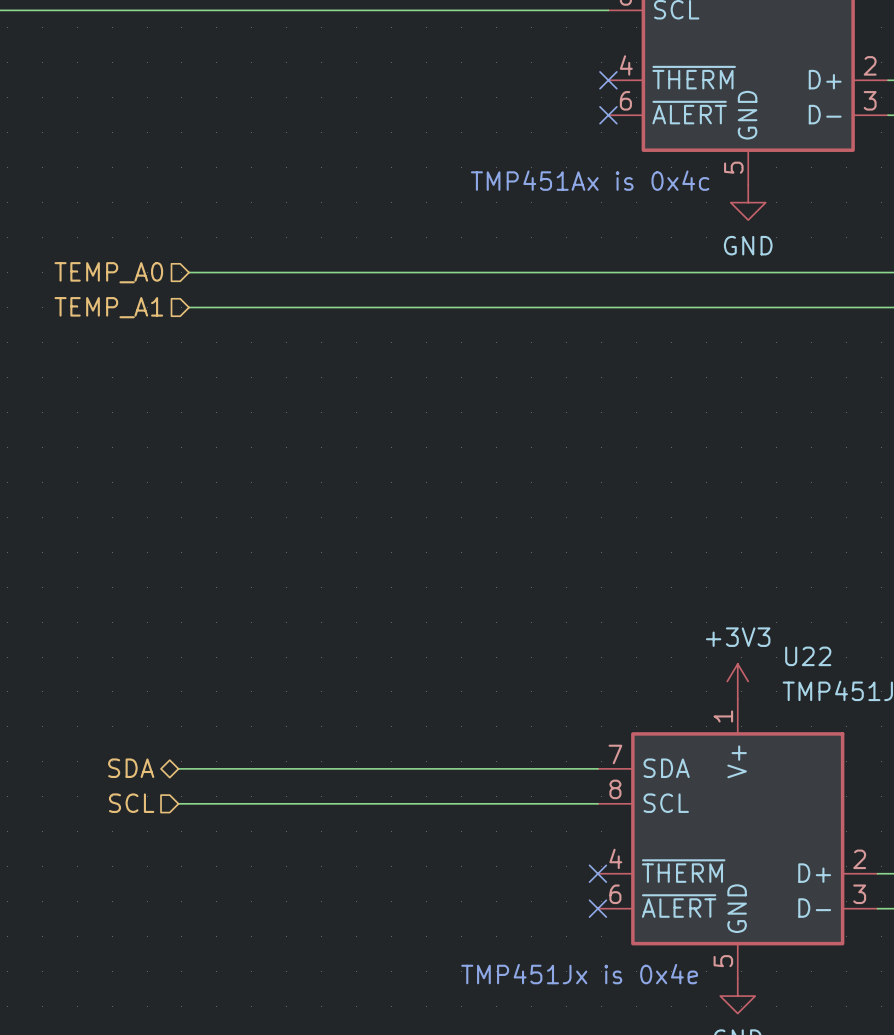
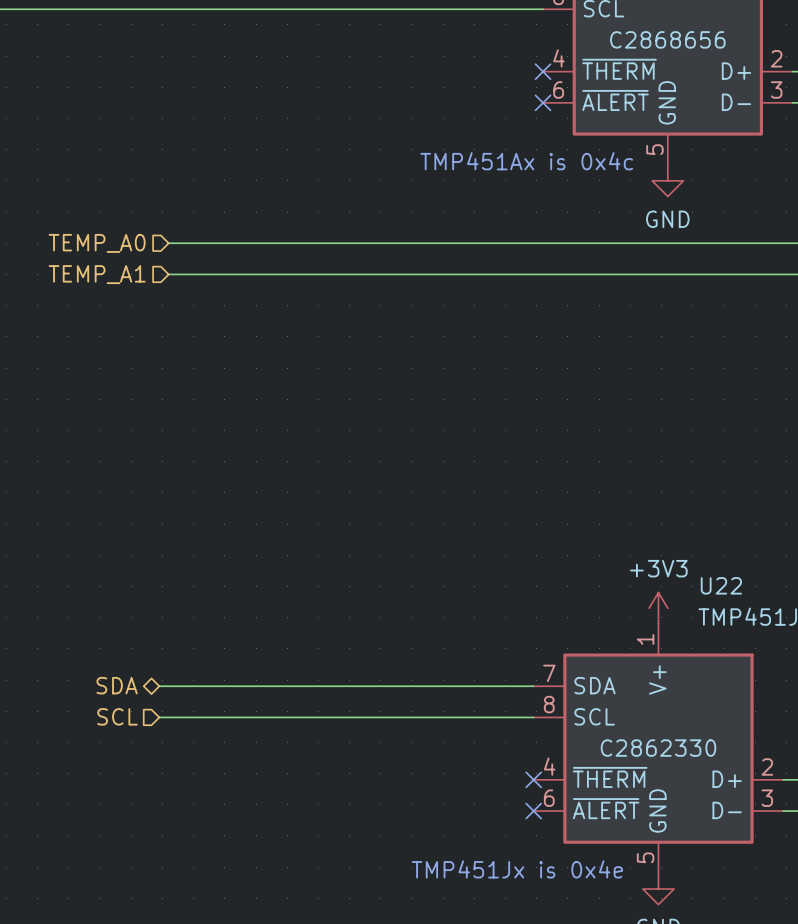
part text: none -> C2868656 (667, 39)
U22 text: none -> C2862330 (658, 748)

